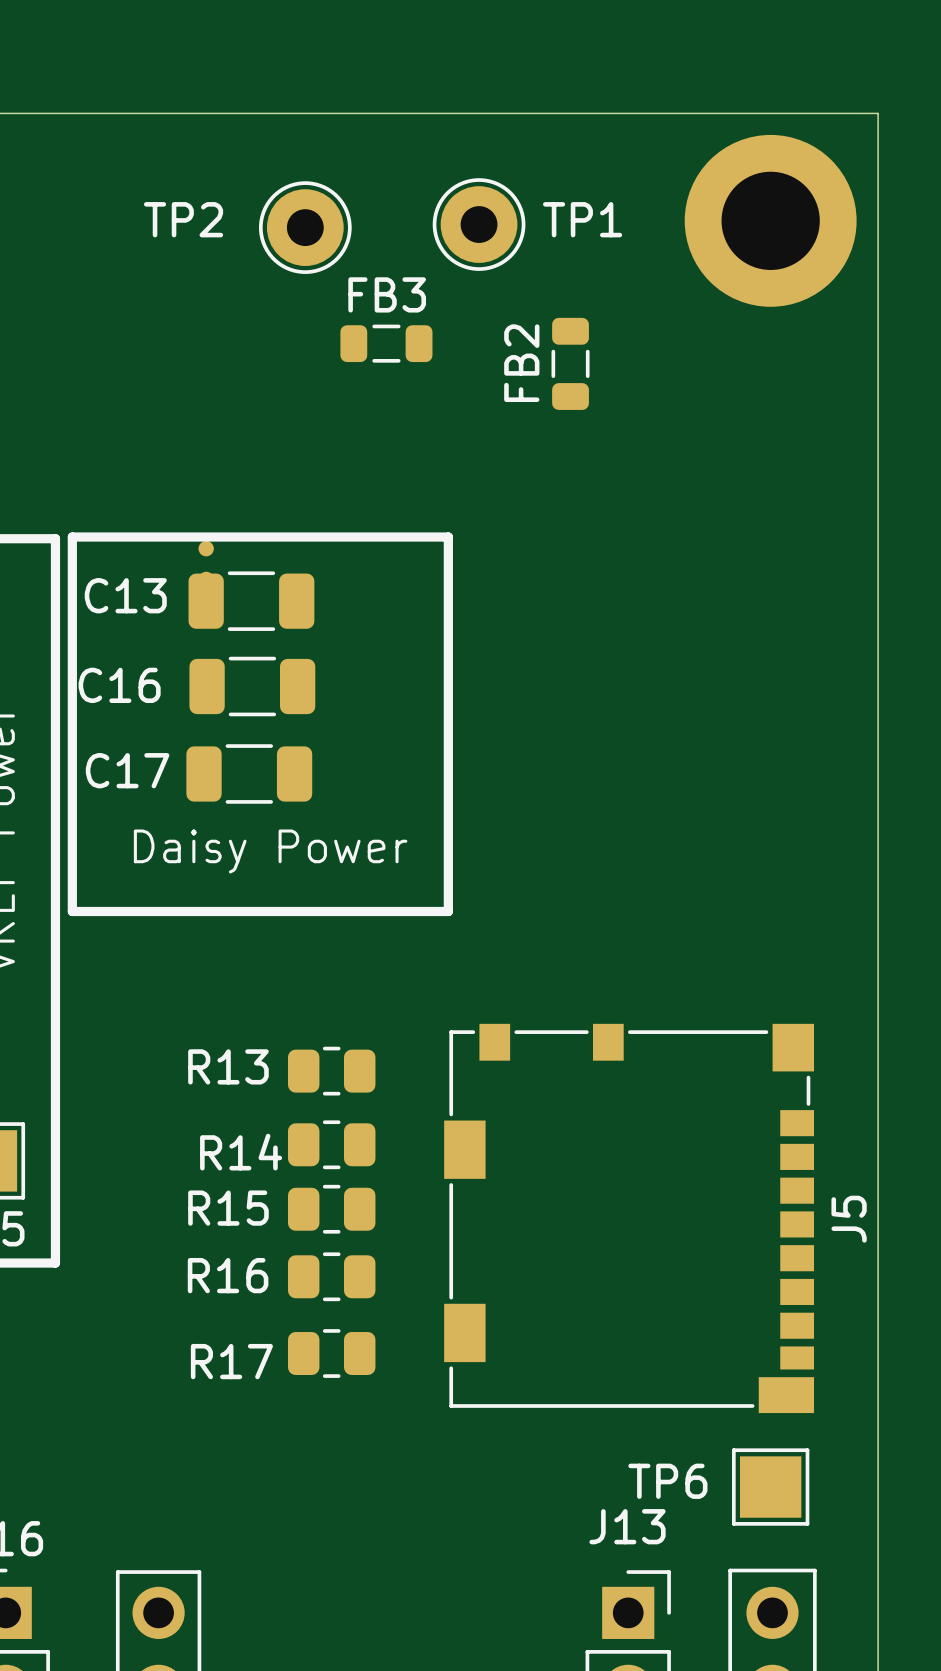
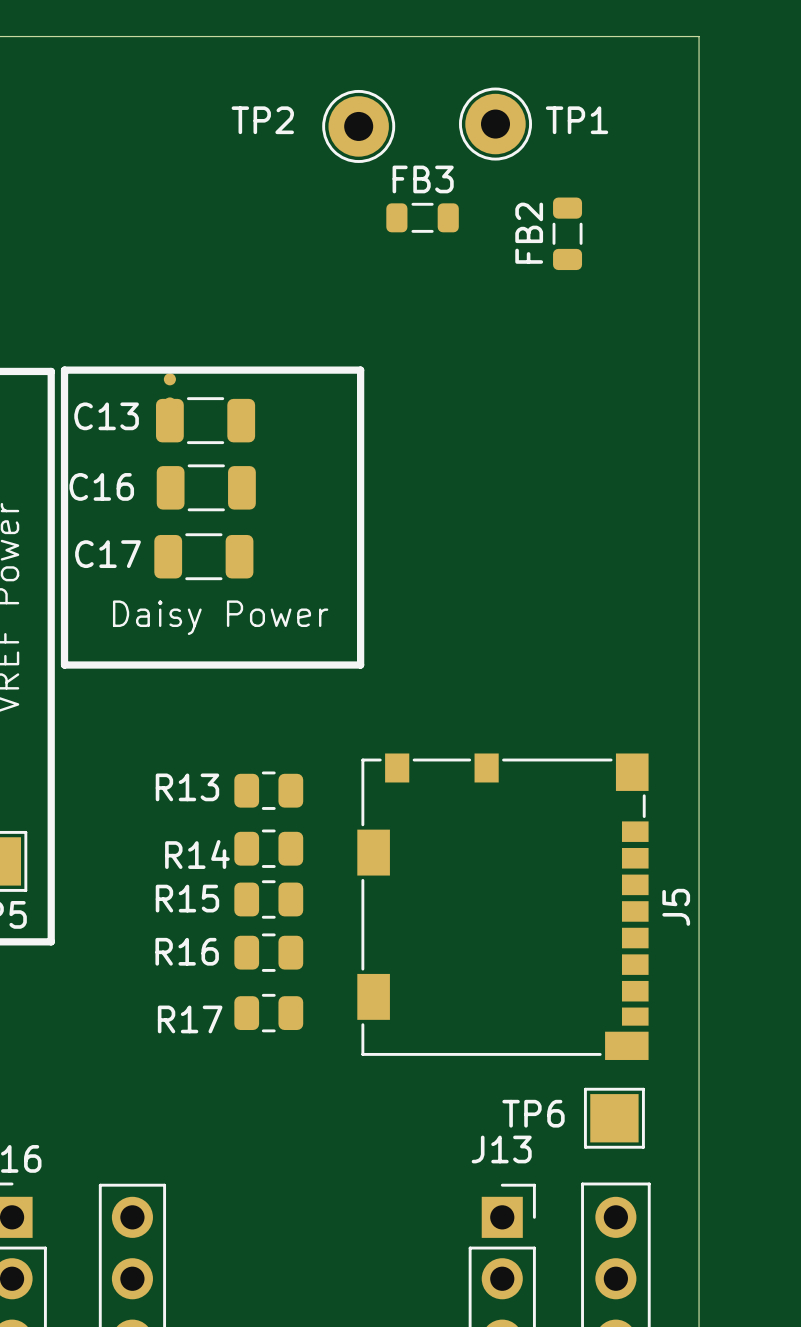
part: (770, 220) -> none
TP1 position: (479, 224) -> (495, 124)
TP2 position: (305, 227) -> (358, 126)
FB3 position: (386, 343) -> (422, 217)
FB2 position: (570, 363) -> (567, 233)

